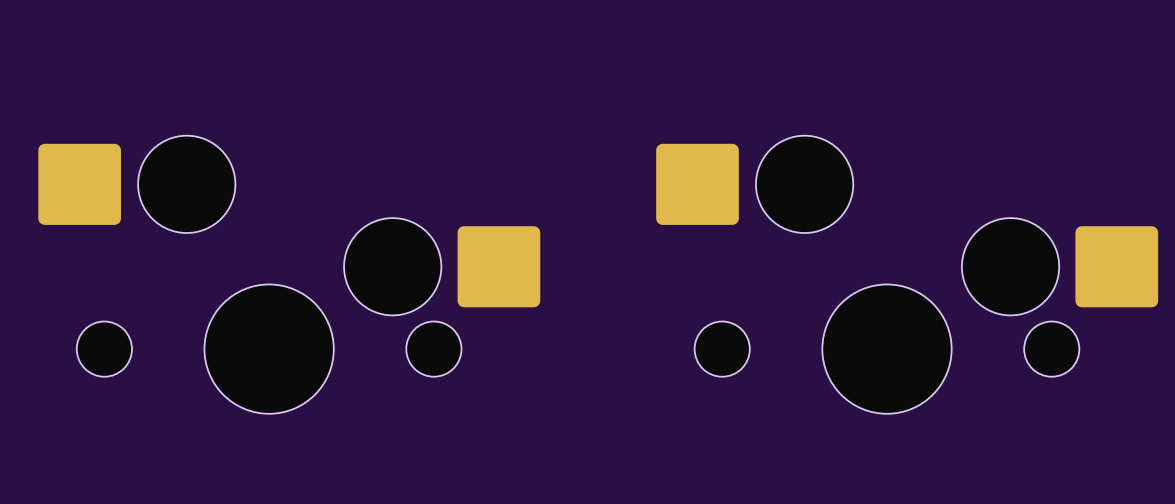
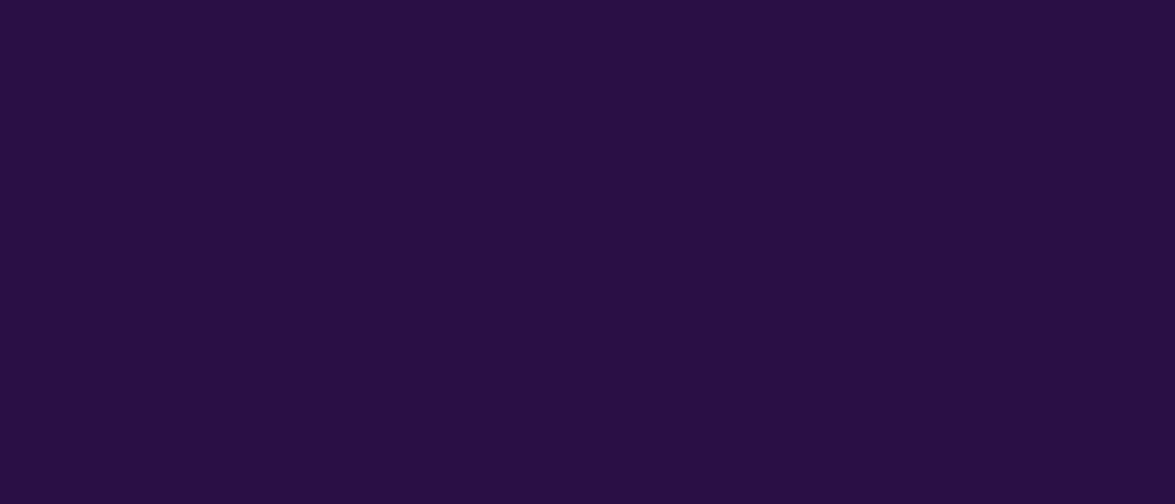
part: (289, 274) -> none
part: (907, 274) -> none

